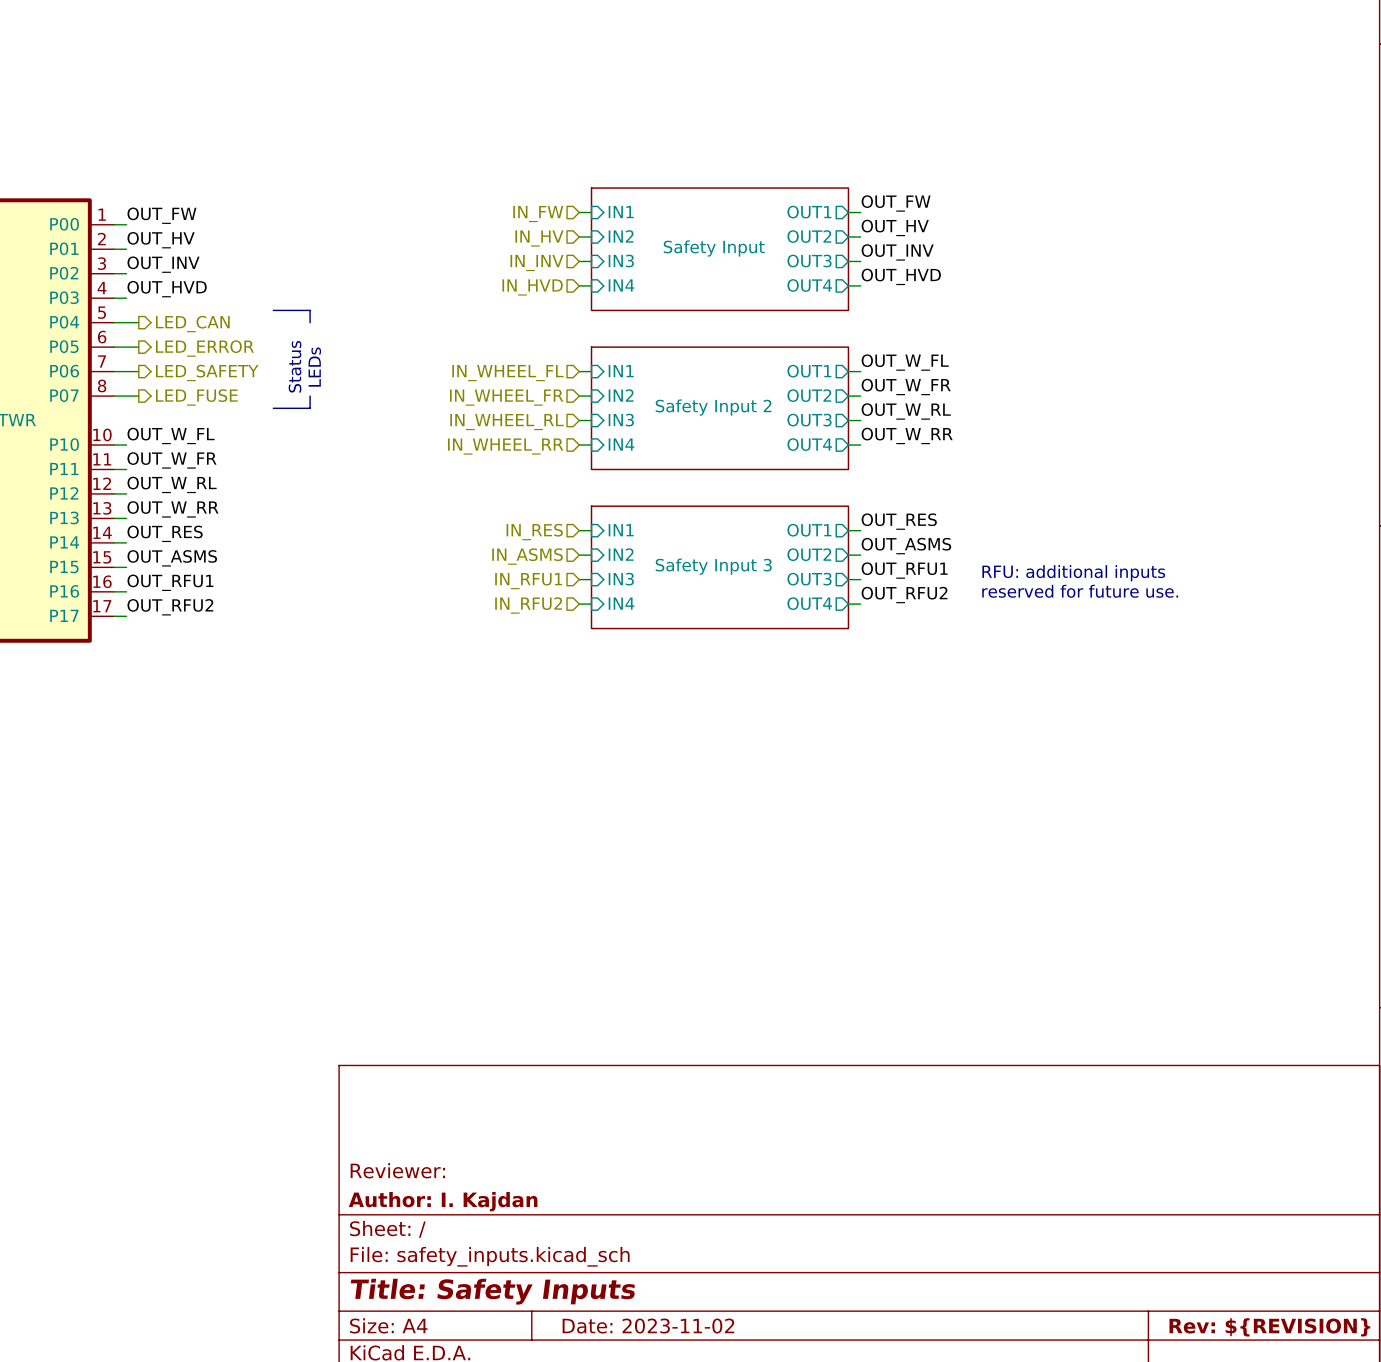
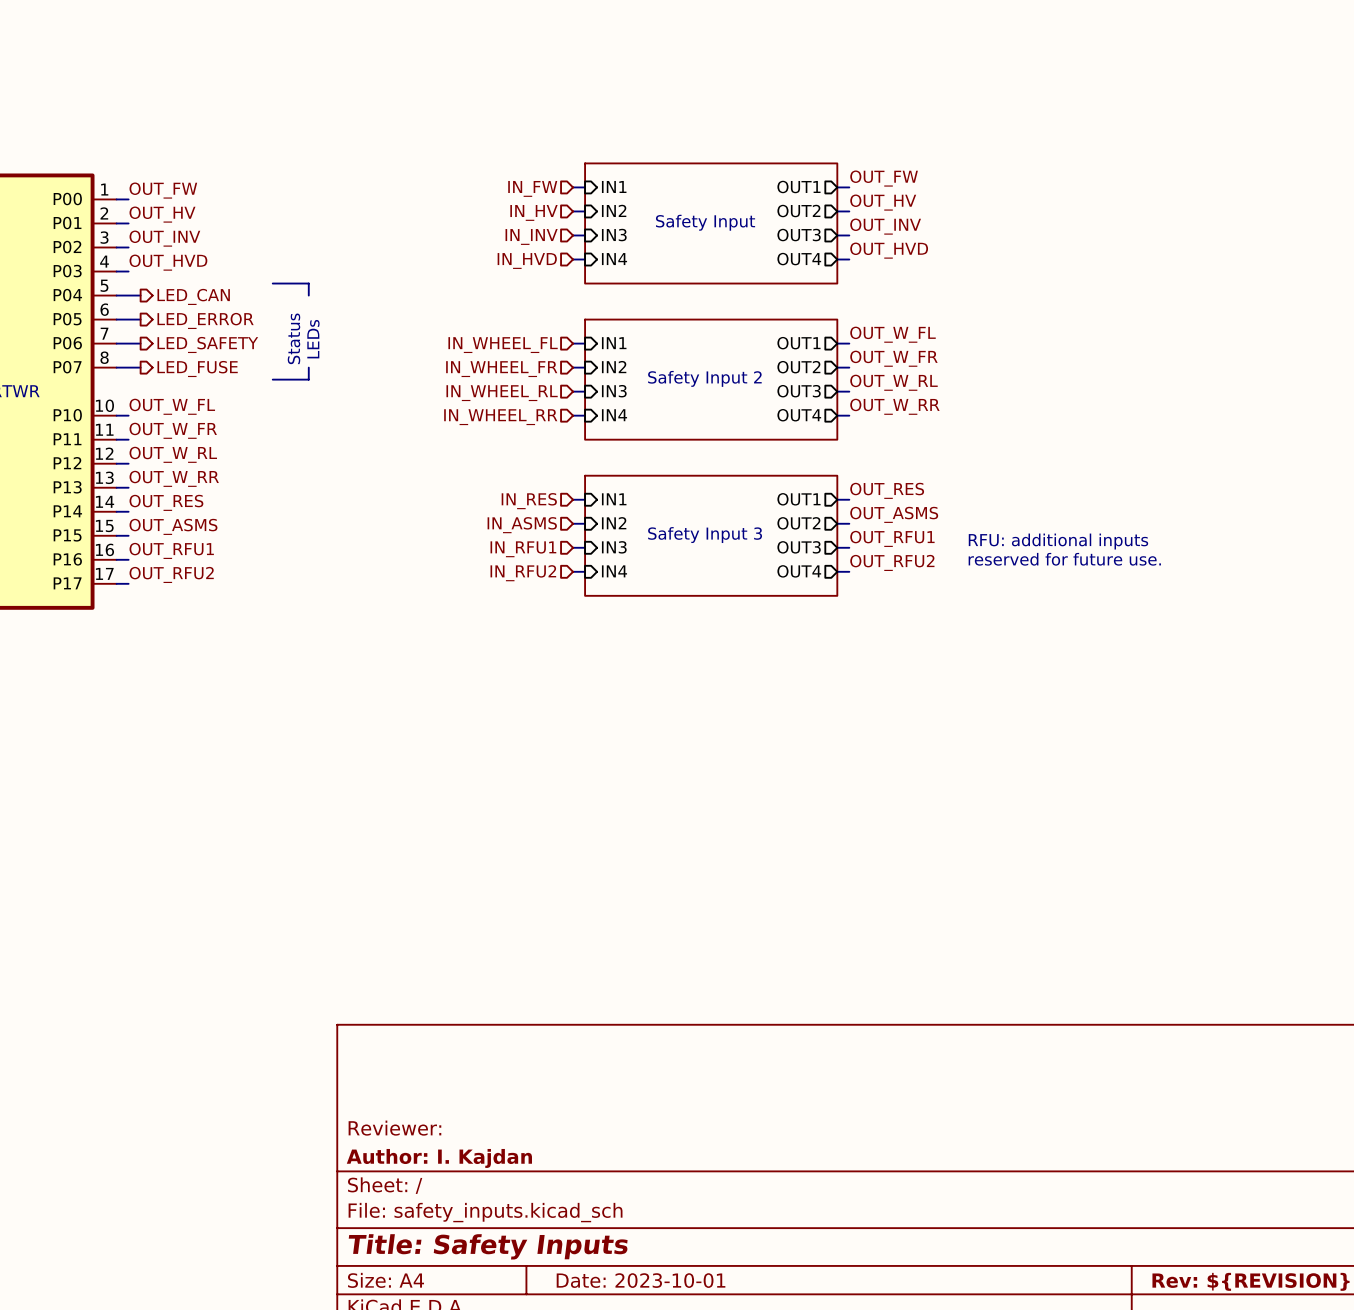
title block: Date: 2023-11-02 (648, 1326) -> Date: 2023-10-01 (641, 1280)

